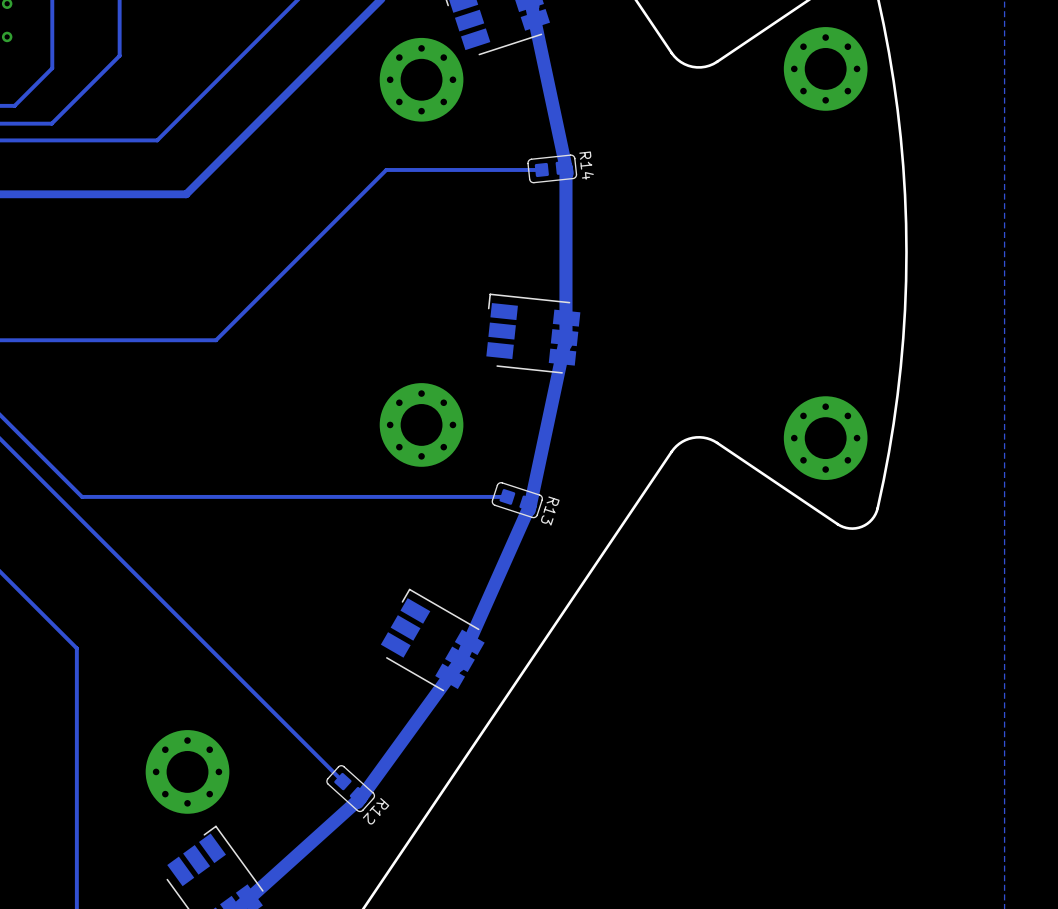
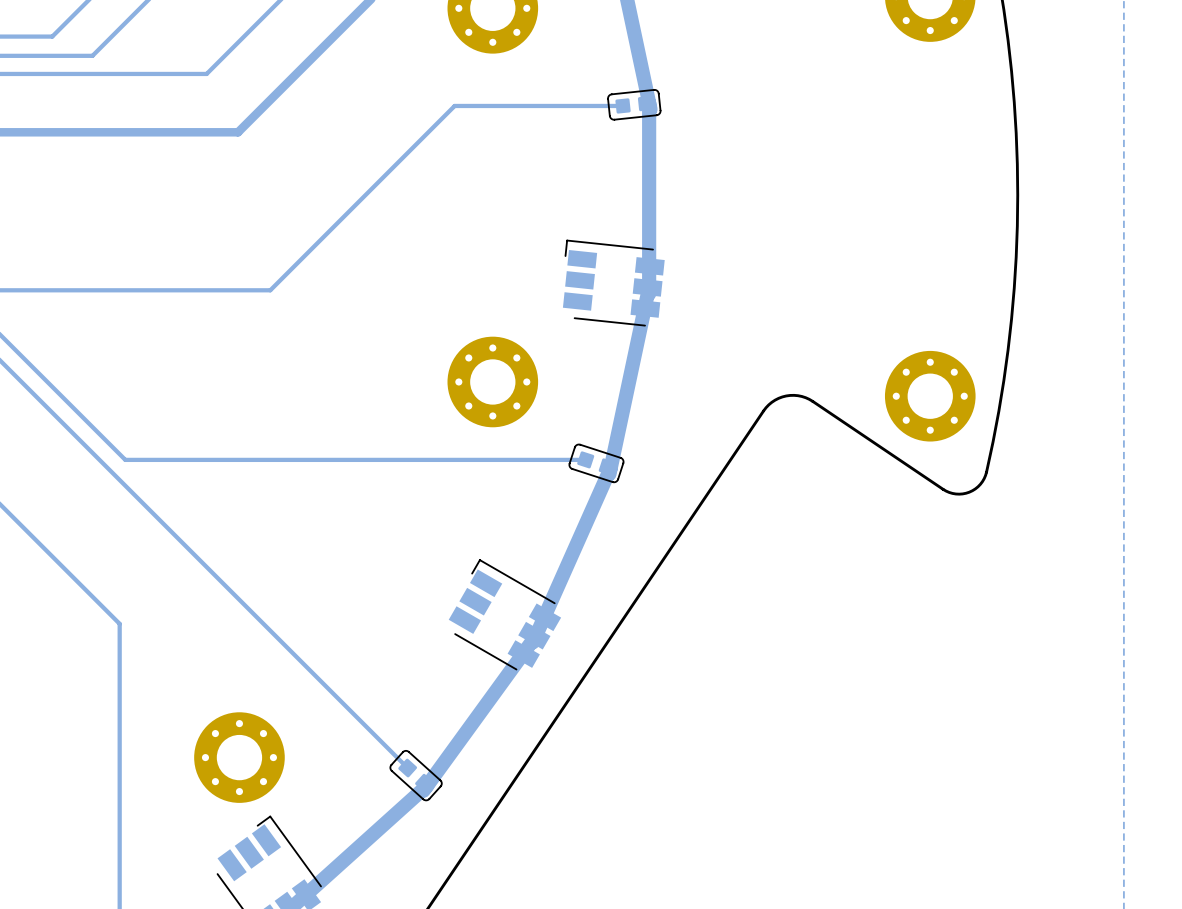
R14 name: R14 (586, 165) -> none
R13 name: R13 (550, 511) -> none
R12 name: R12 (376, 811) -> none

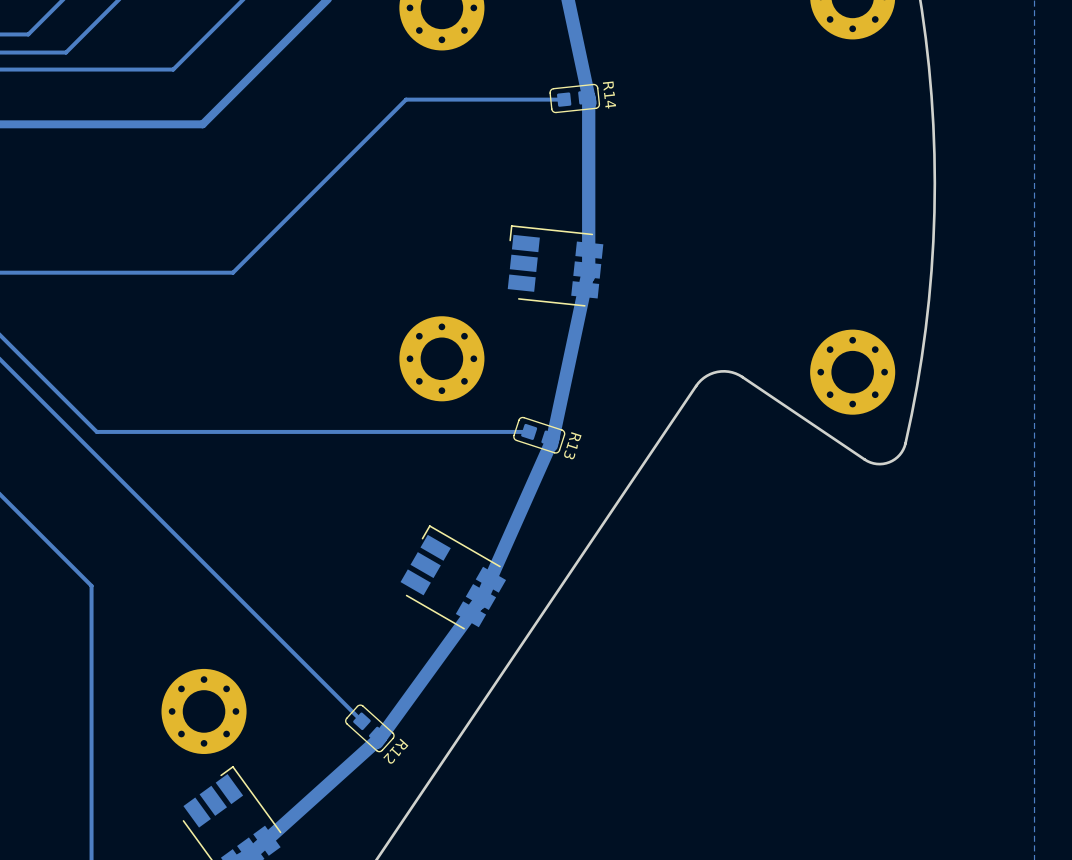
R14 name: none -> R14 (609, 95)
R13 name: none -> R13 (572, 445)
R12 name: none -> R12 (395, 751)

